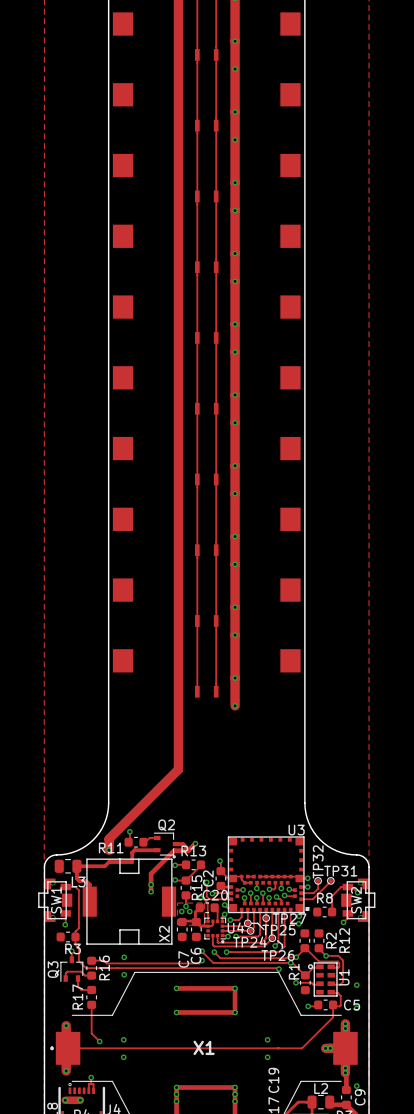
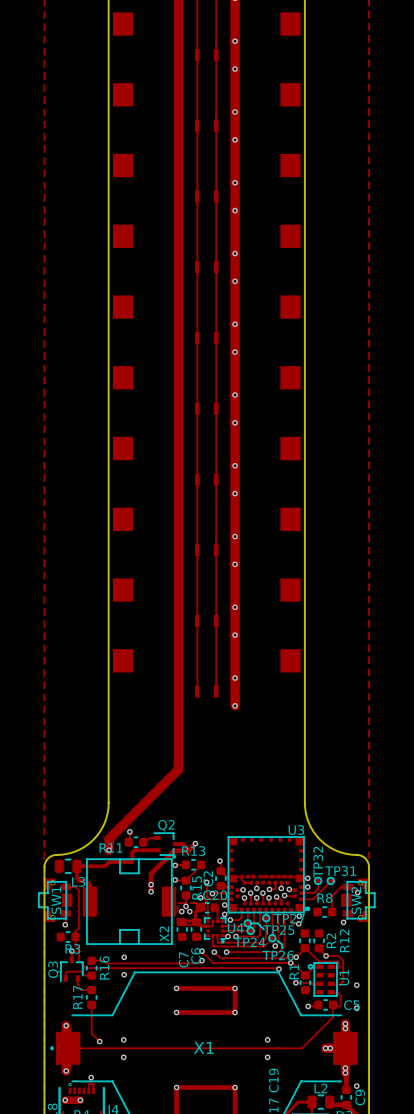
via: (176, 1094) -> none
via: (235, 1094) -> none
via: (176, 1101) -> none
via: (235, 1101) -> none

